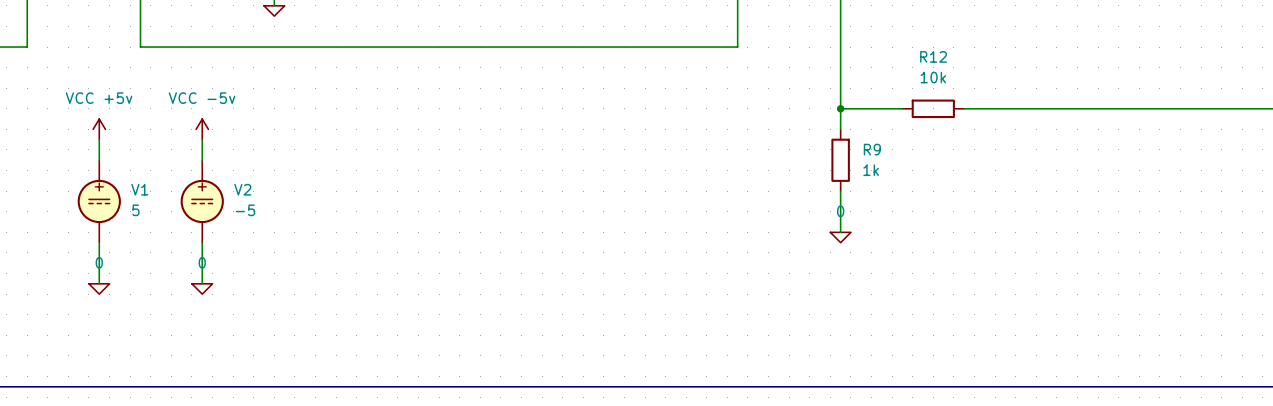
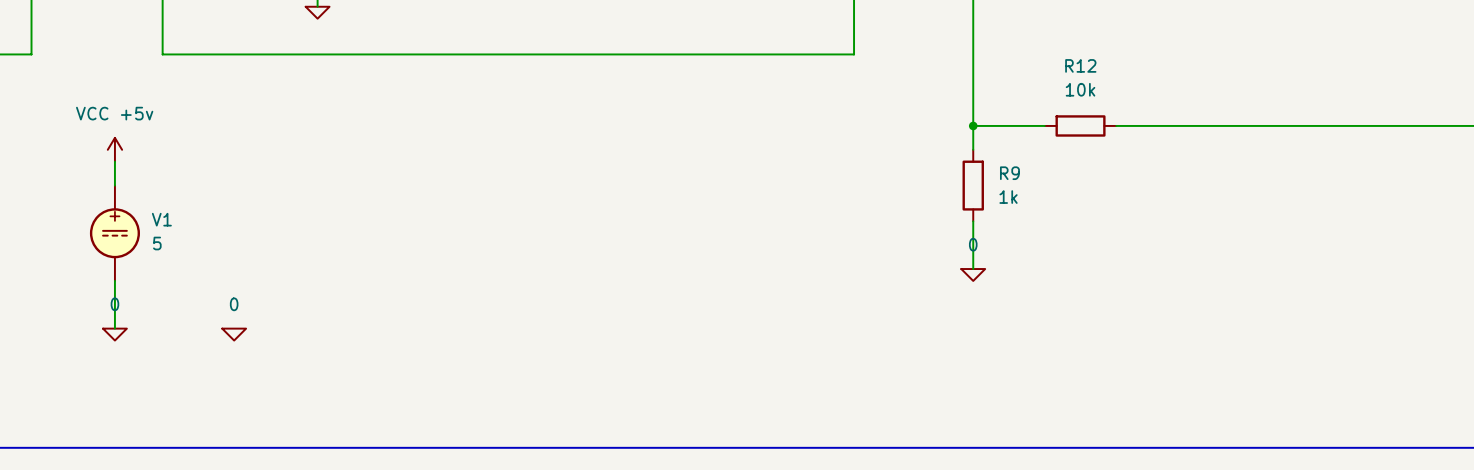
power symbol: VCC -5v (202, 129) -> none
wire: (202, 139) (202, 160) -> none
V2: -5 (202, 201) -> none
wire: (202, 242) (202, 283) -> none

